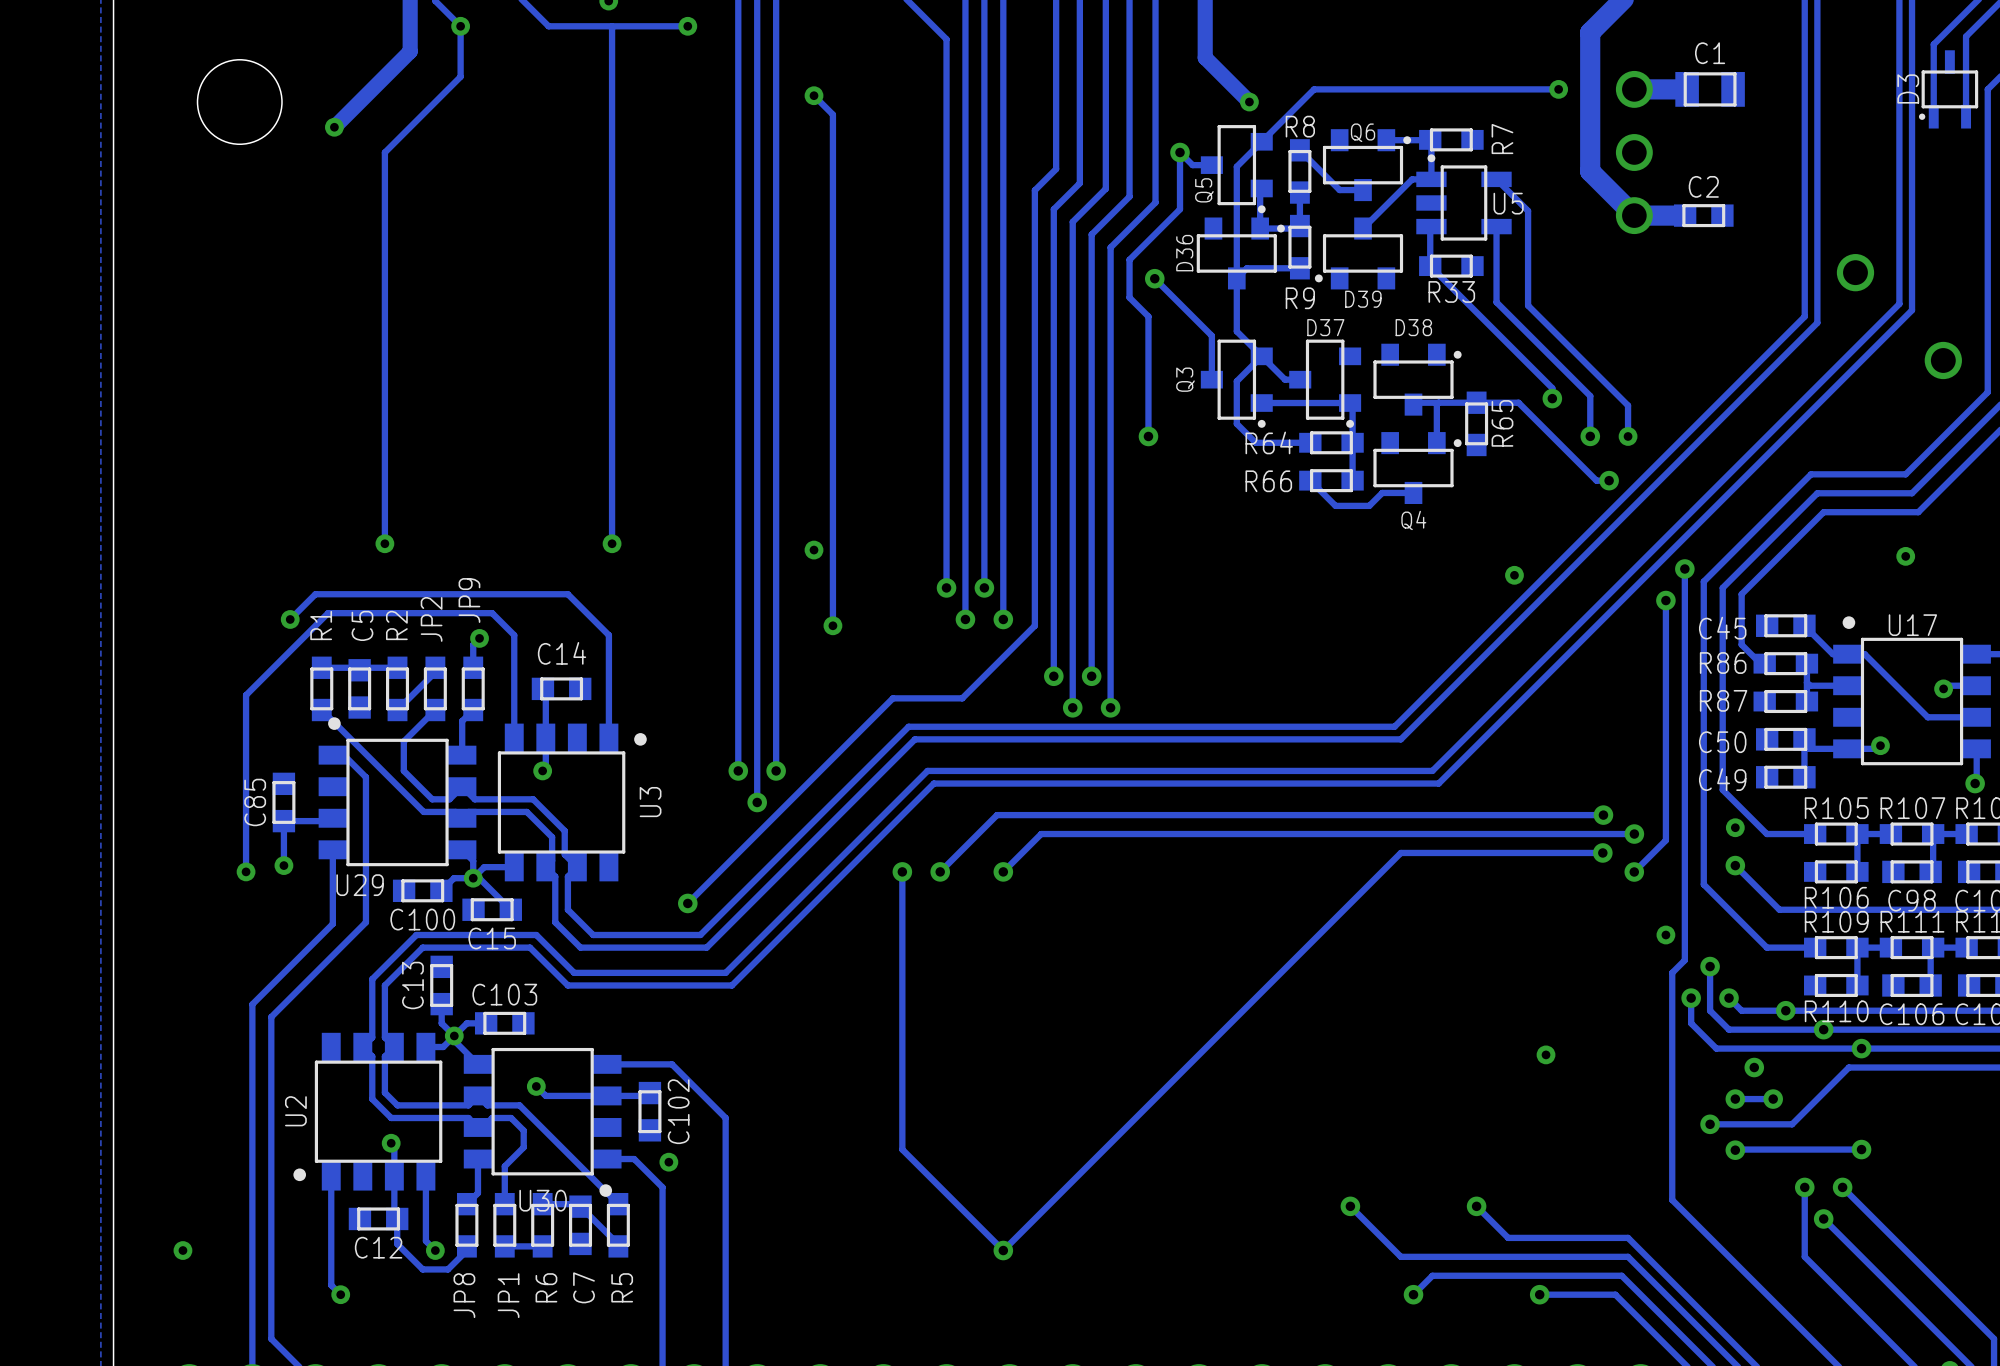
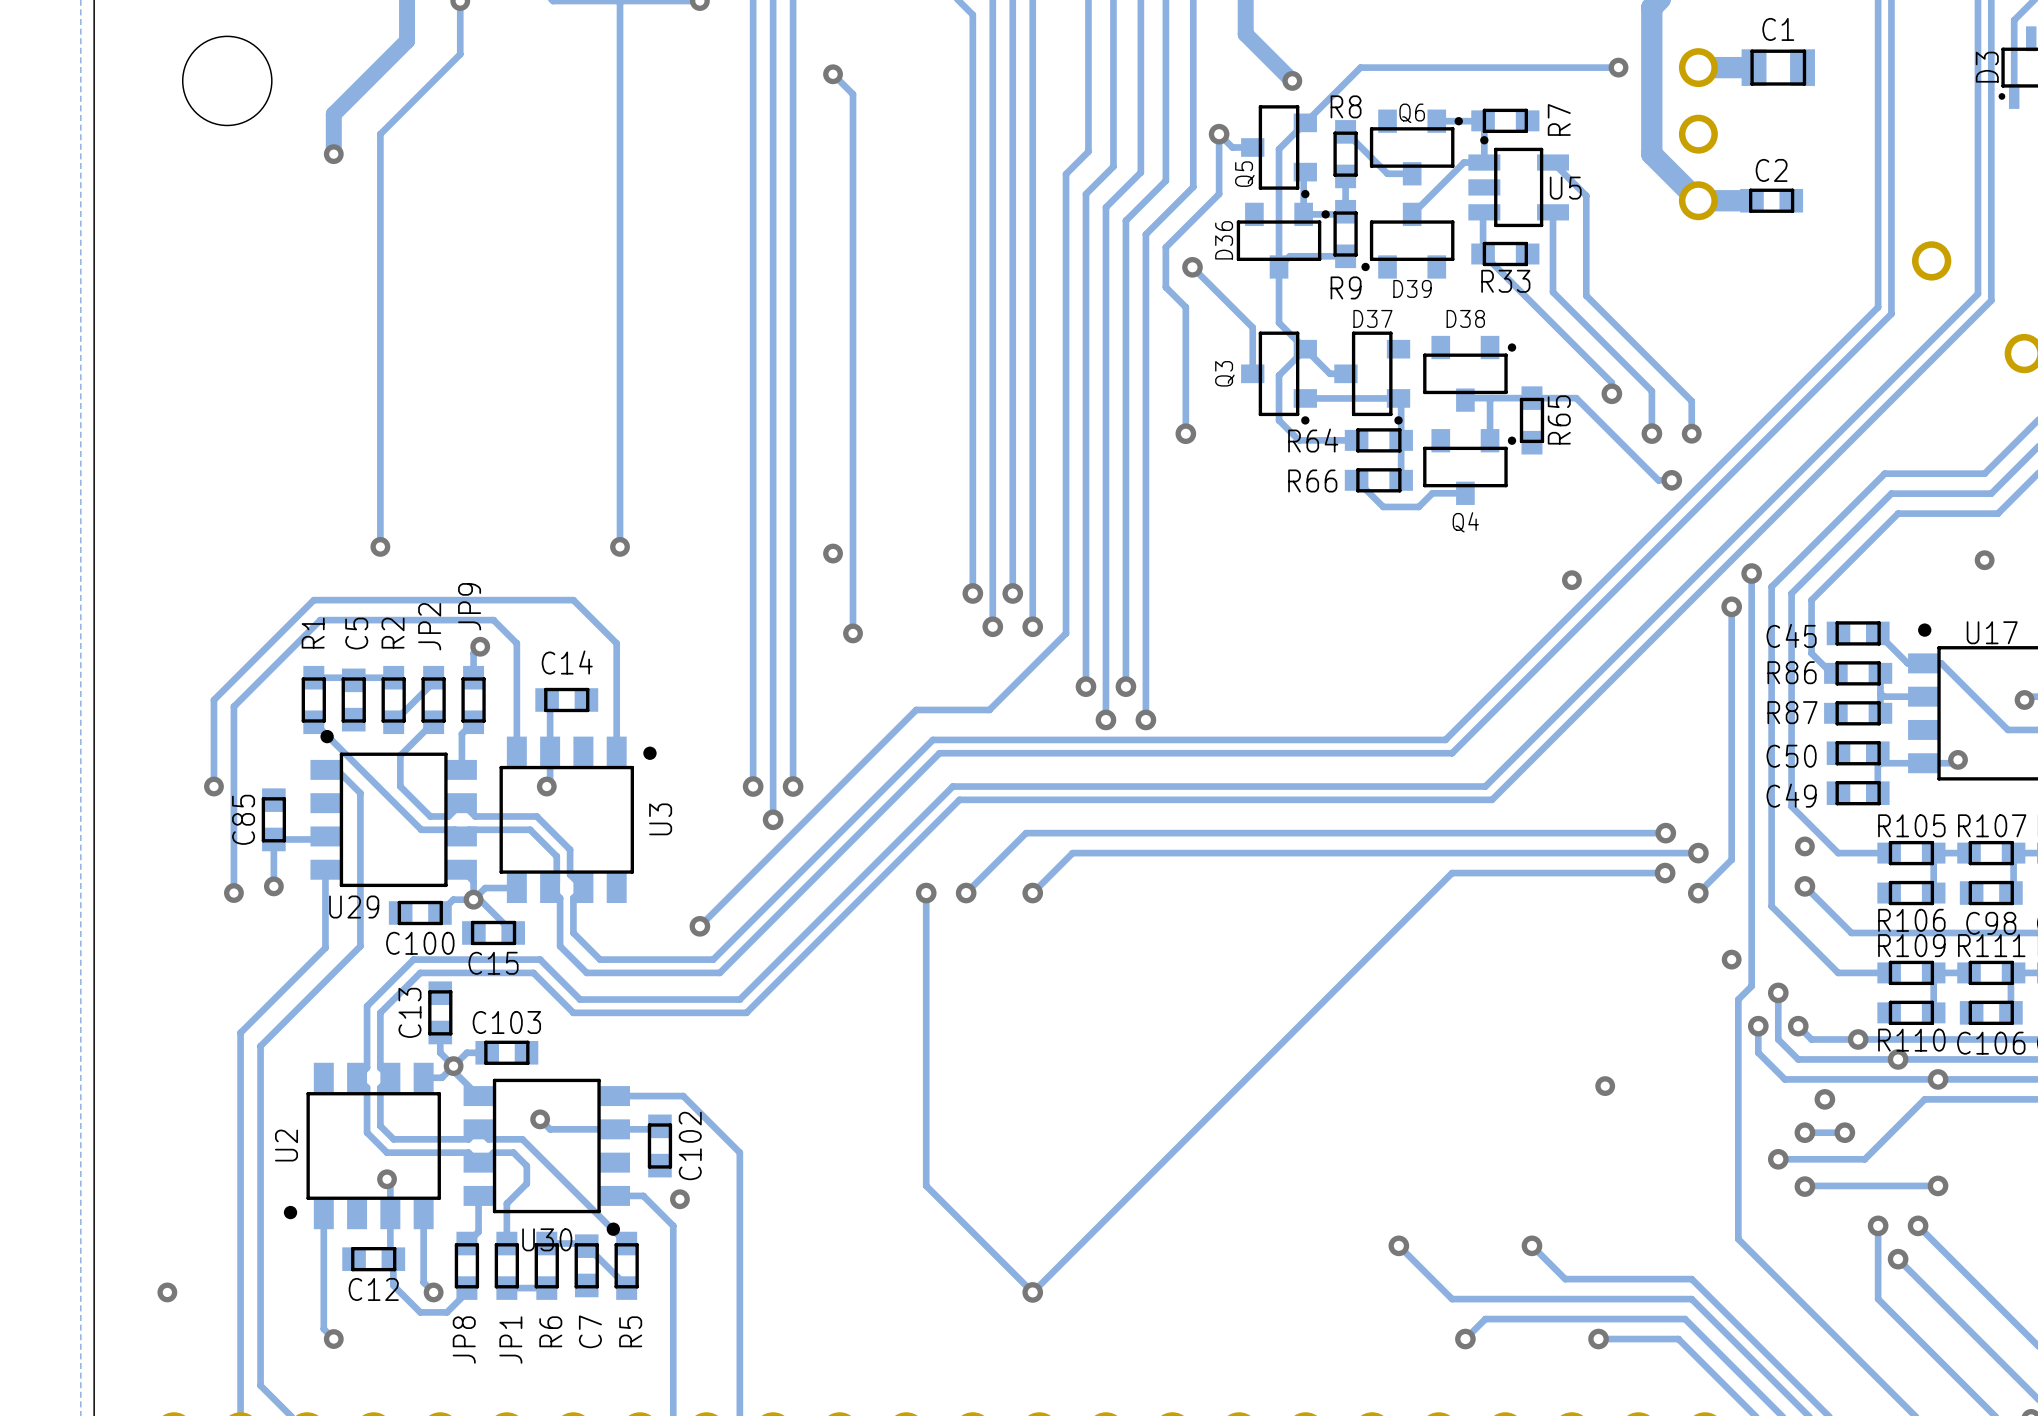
track: (410, 51) (334, 127) -> (407, 27) (407, 40) (333, 114) (333, 154)
via position: (334, 127) -> (333, 154)
track: (321, 594) (315, 594) (290, 619) -> (313, 600) (213, 699) (213, 786)
via: (290, 619) -> none
via: none -> (213, 786)

